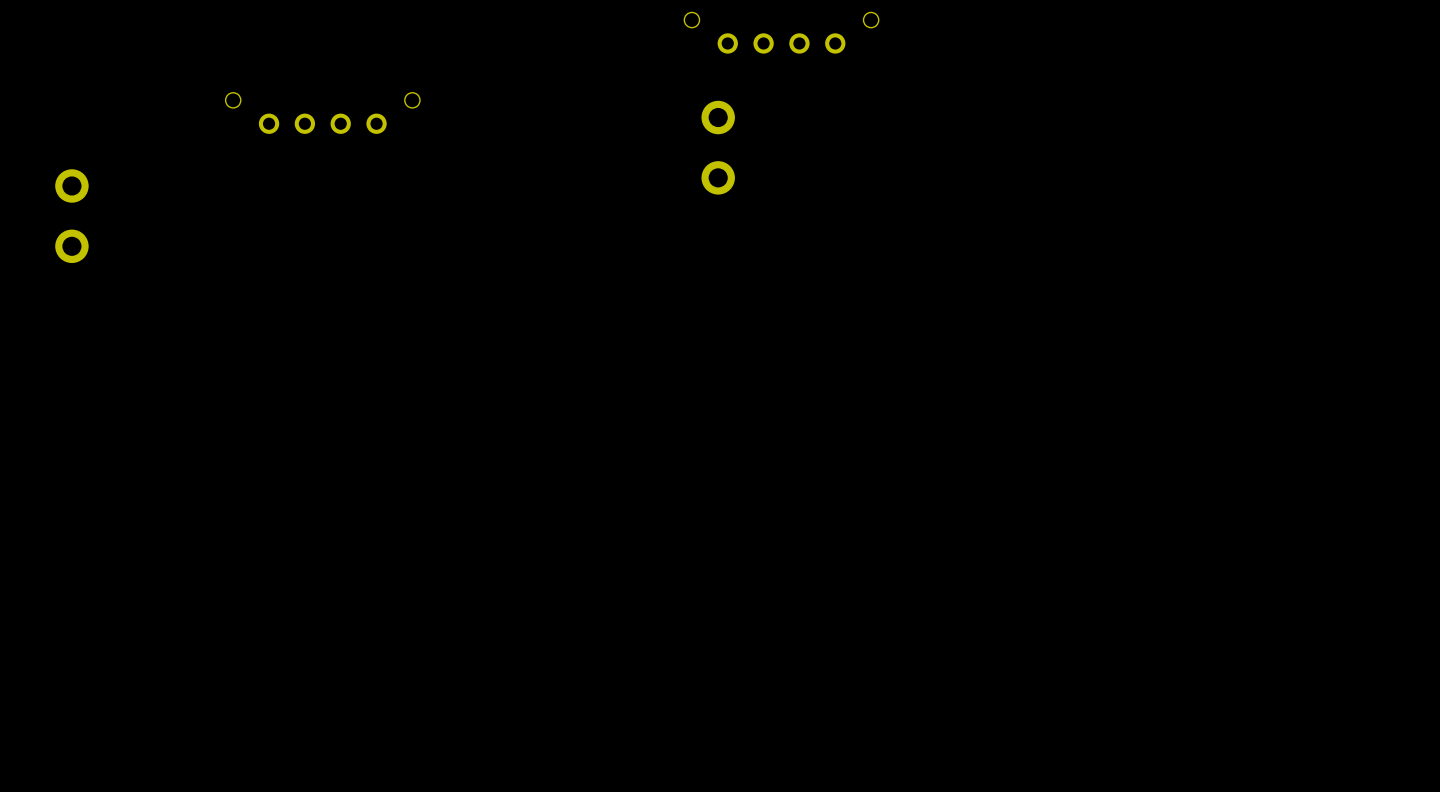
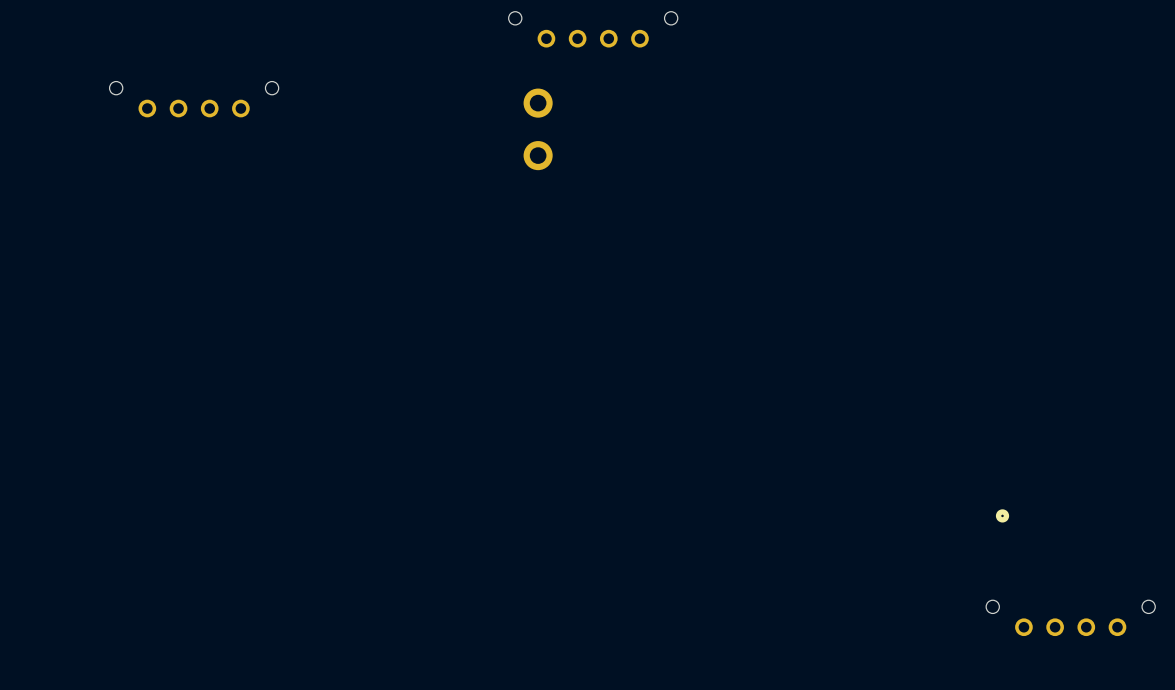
part: none -> (1002, 515)
part: none -> (1070, 618)

